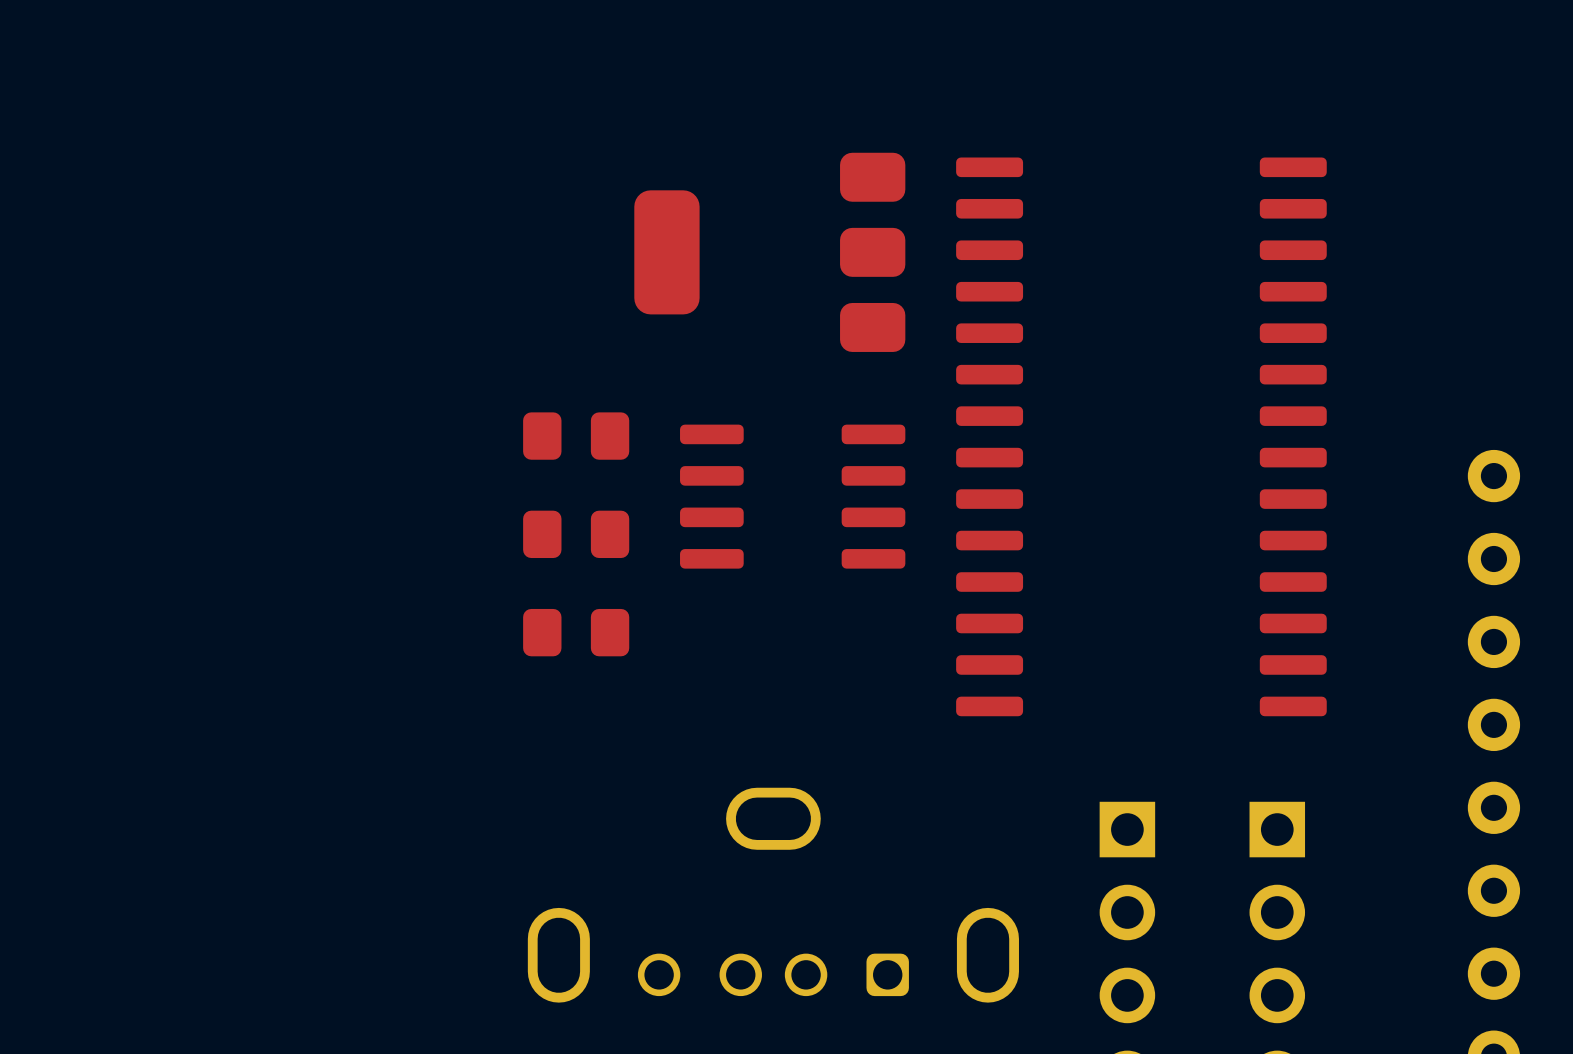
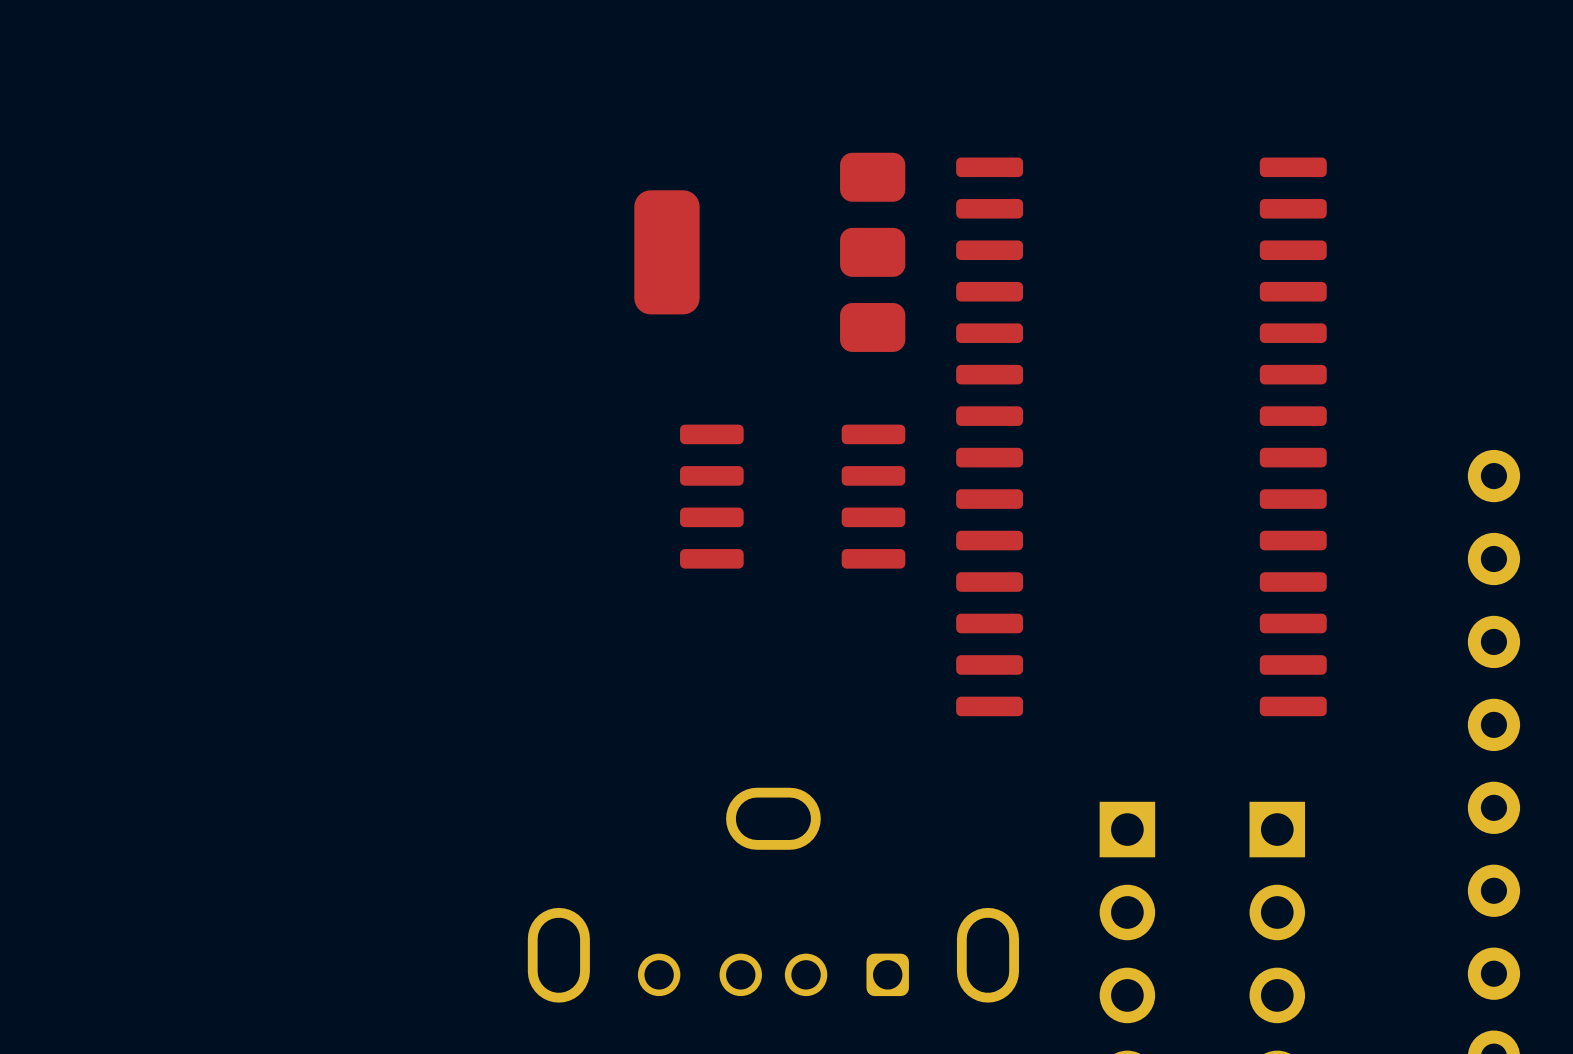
part: (576, 436) -> none
part: (576, 534) -> none
part: (576, 632) -> none

